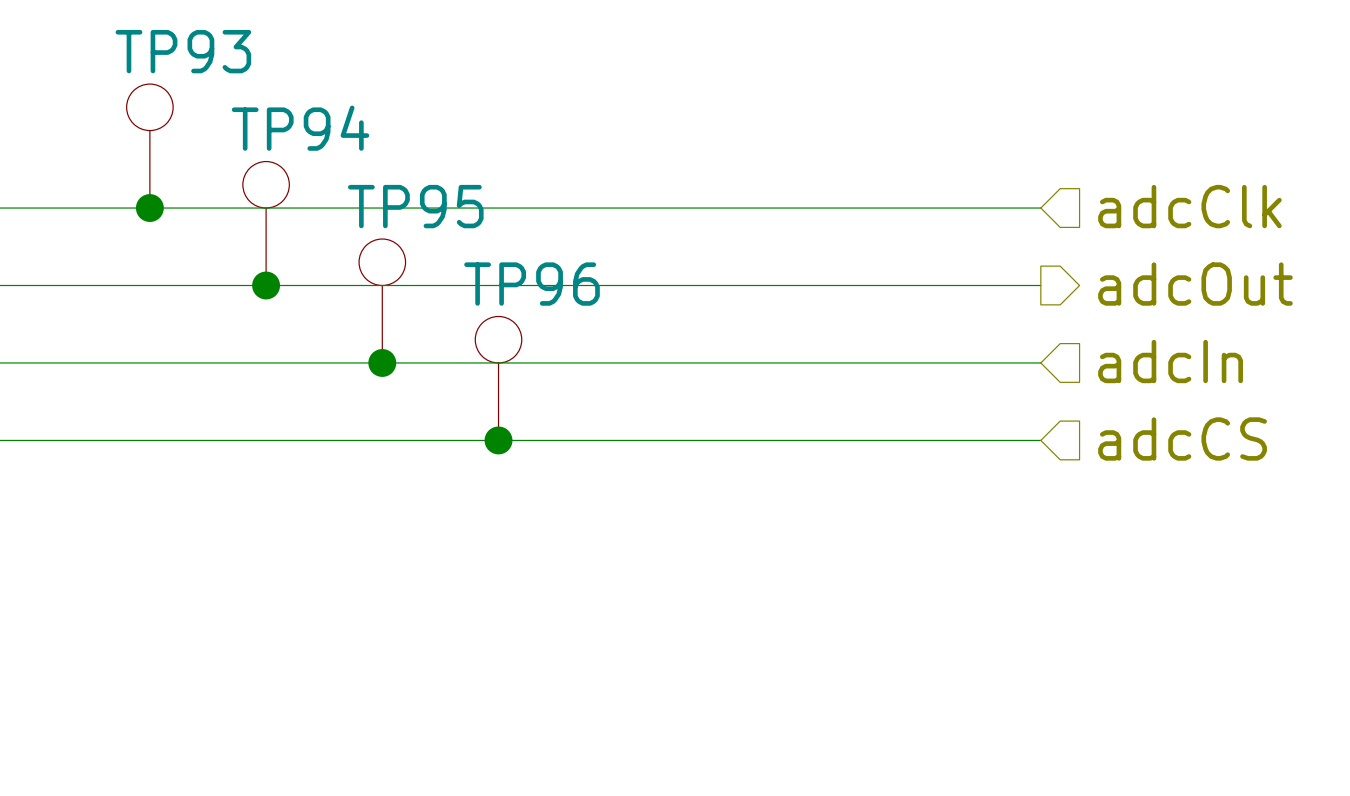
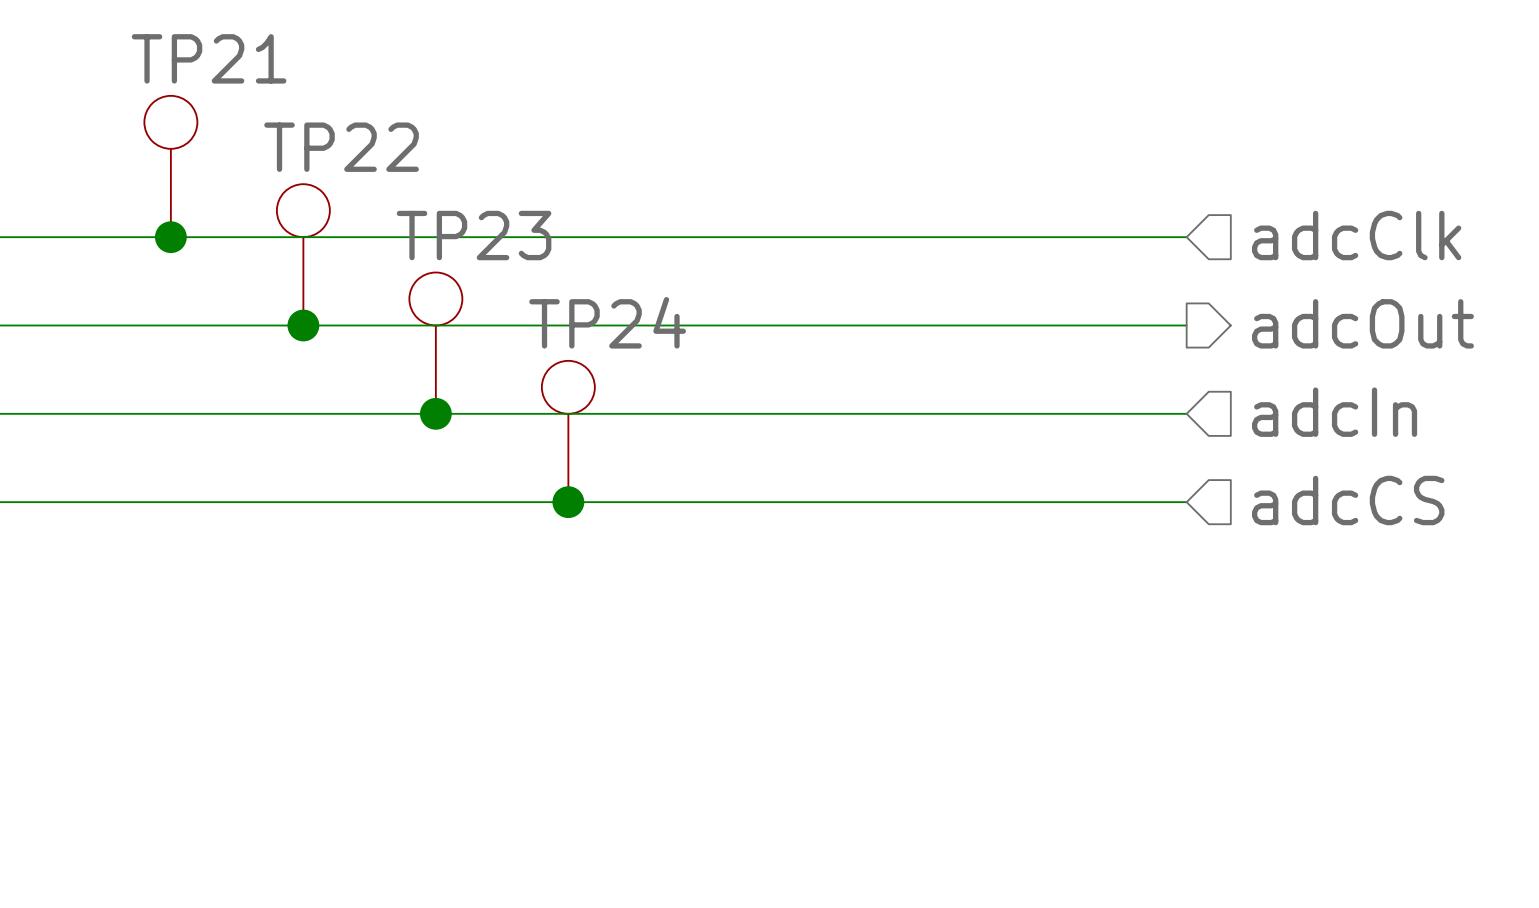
TP93 name: TP93 (183, 51) -> TP21 (209, 58)
TP94 name: TP94 (300, 128) -> TP22 (341, 147)
TP95 name: TP95 (415, 206) -> TP23 (474, 235)
TP96 name: TP96 (532, 284) -> TP24 (607, 322)

